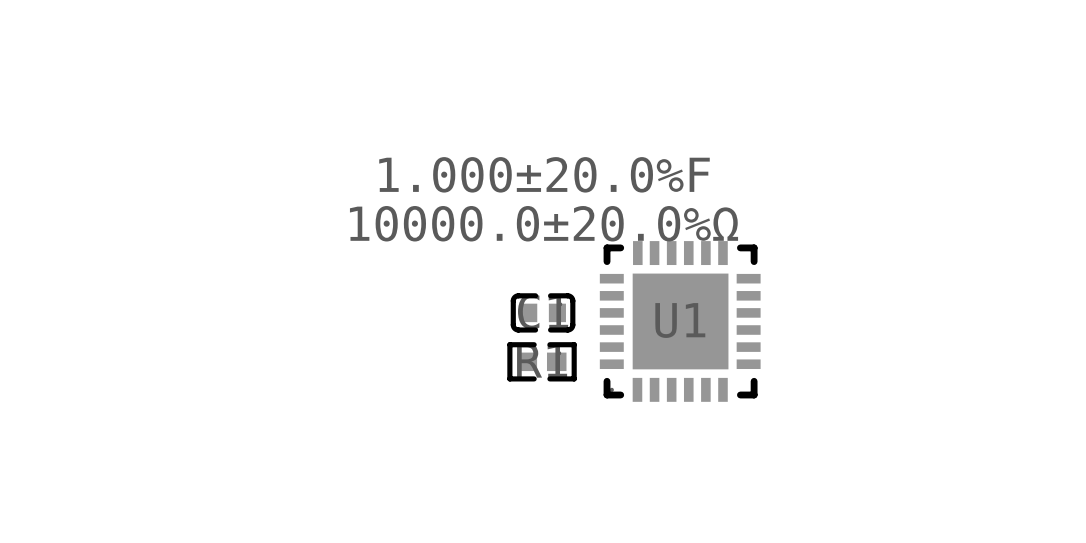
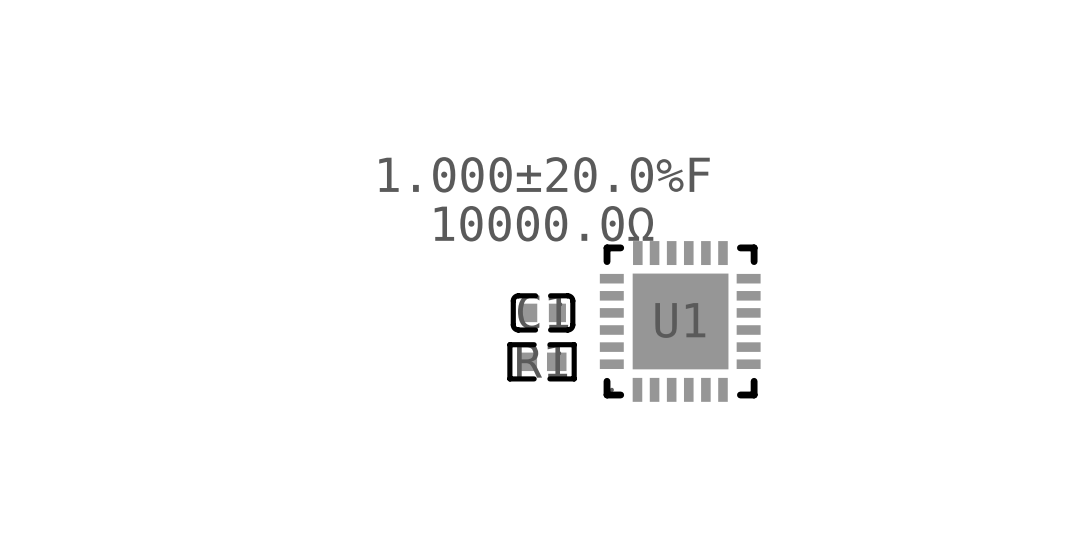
part value: 10000.0±20.0%Ω (544, 223) -> 10000.0Ω (544, 223)

